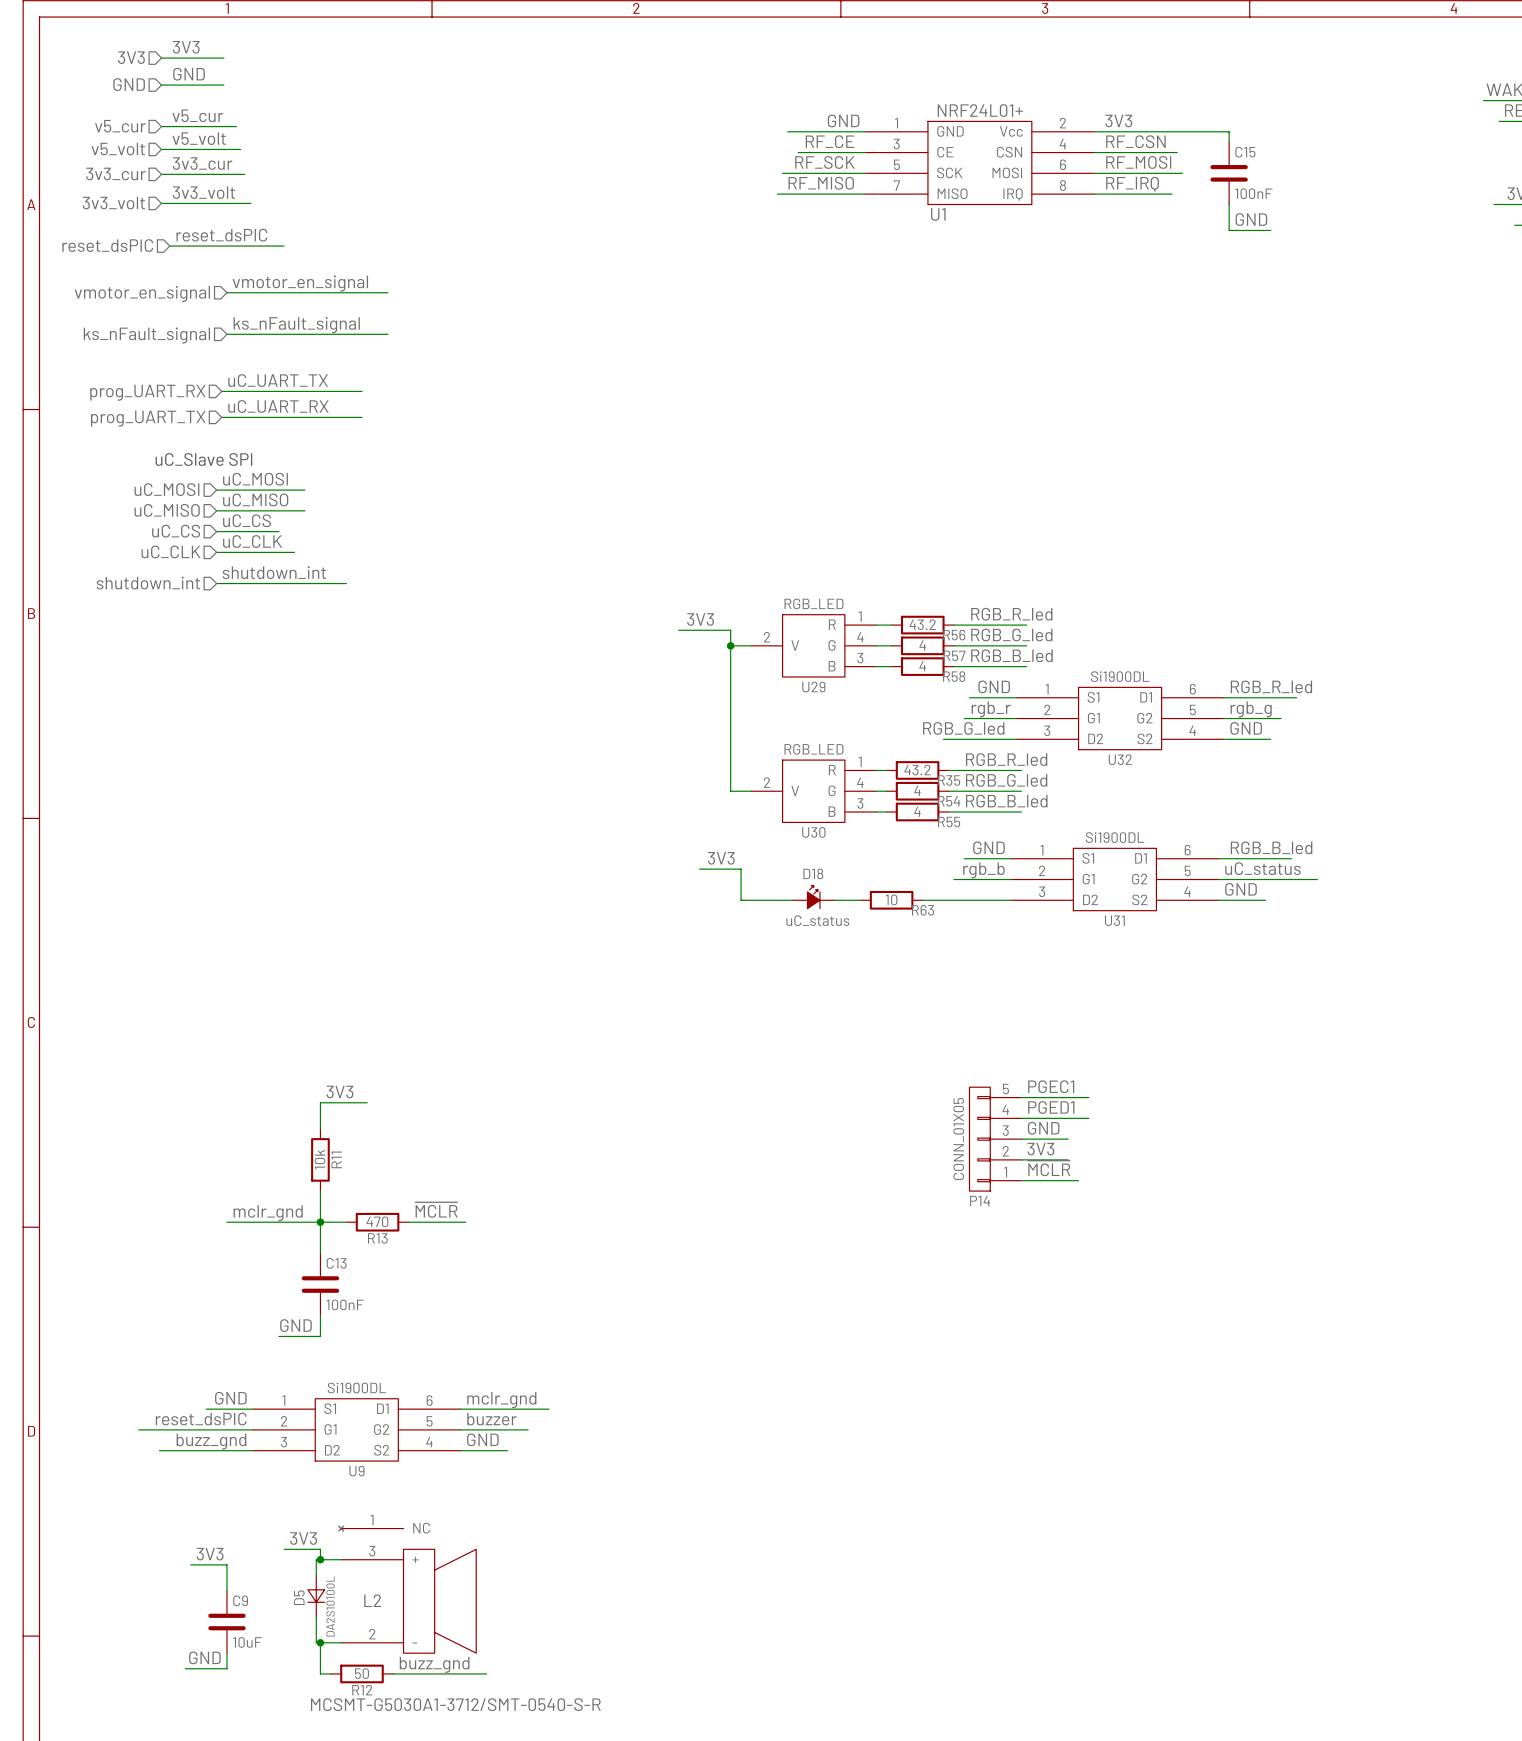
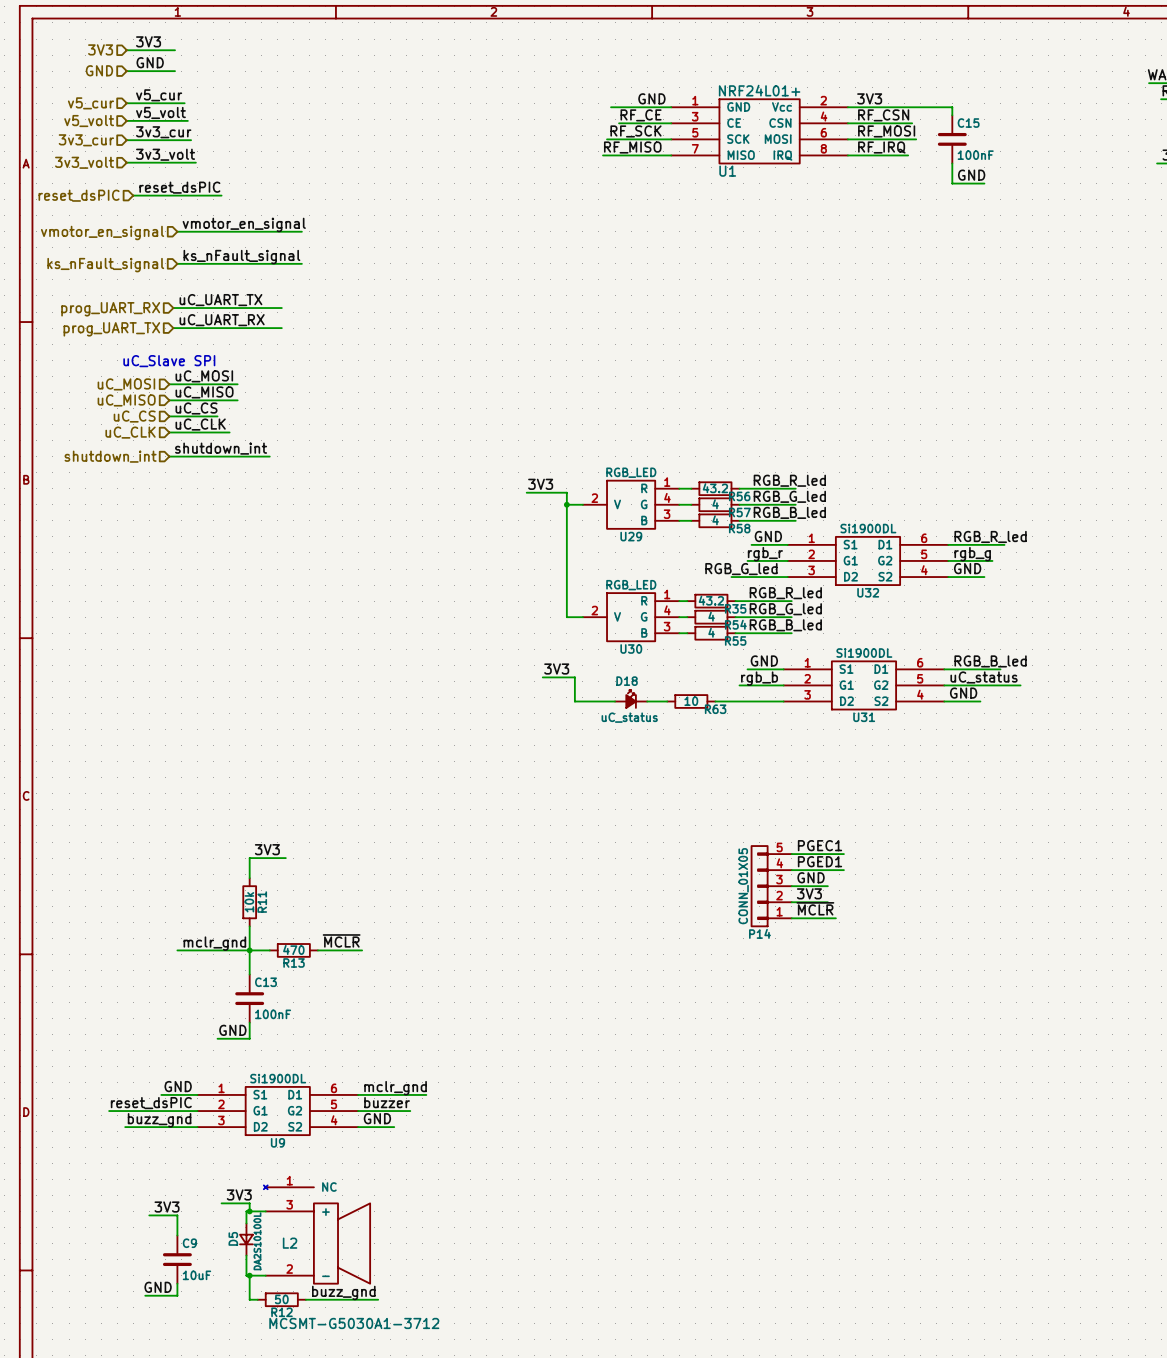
L2 value: MCSMT-G5030A1-3712/SMT-0540-S-R (455, 1704) -> MCSMT-G5030A1-3712 (354, 1323)

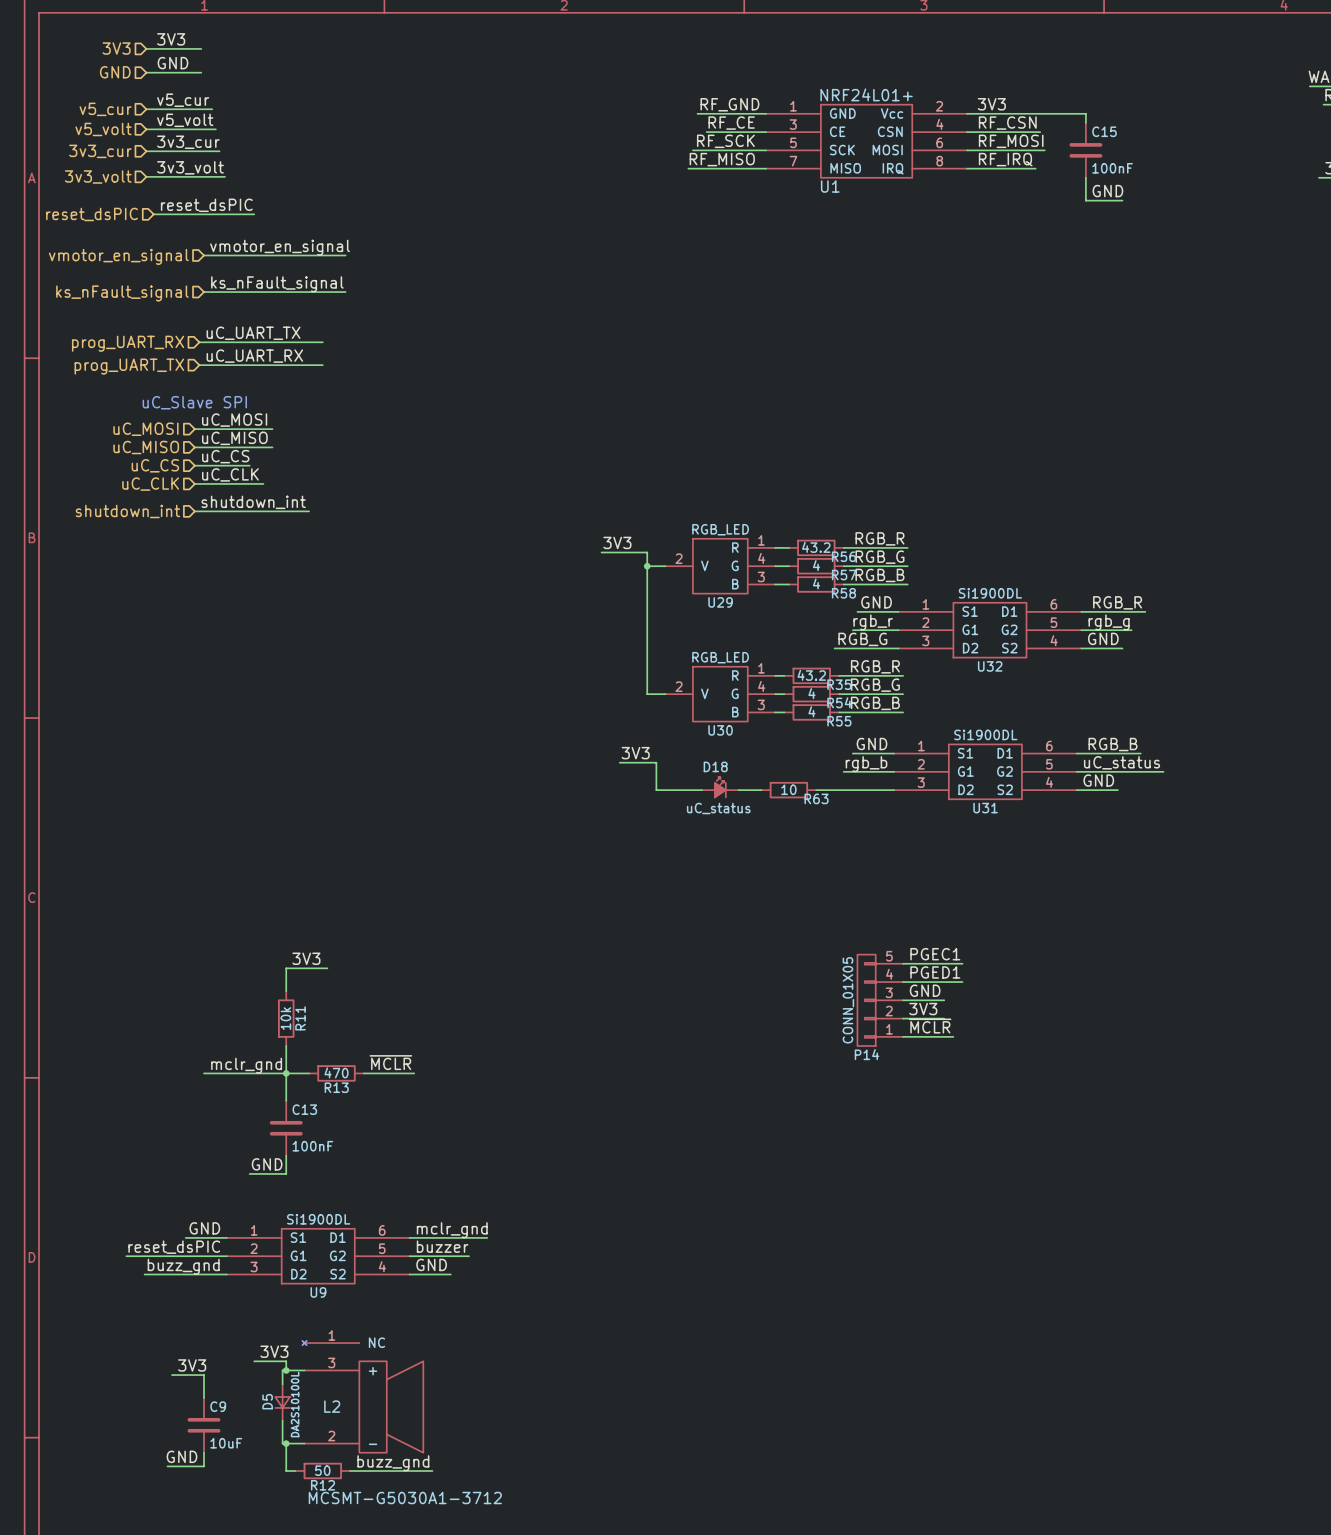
label: GND (651, 98) -> RF_GND (729, 104)
label: RGB_R_led (789, 480) -> RGB_R (879, 538)
label: RGB_G_led (789, 496) -> RGB_G (879, 557)
label: RGB_B_led (789, 512) -> RGB_B (879, 575)
label: RGB_R_led (990, 536) -> RGB_R (1117, 602)
label: RGB_G_led (741, 569) -> RGB_G (862, 639)
label: RGB_R_led (785, 593) -> RGB_R (875, 666)
label: RGB_G_led (785, 609) -> RGB_G (875, 685)
label: RGB_B_led (785, 625) -> RGB_B (875, 703)
label: RGB_B_led (990, 661) -> RGB_B (1113, 744)

